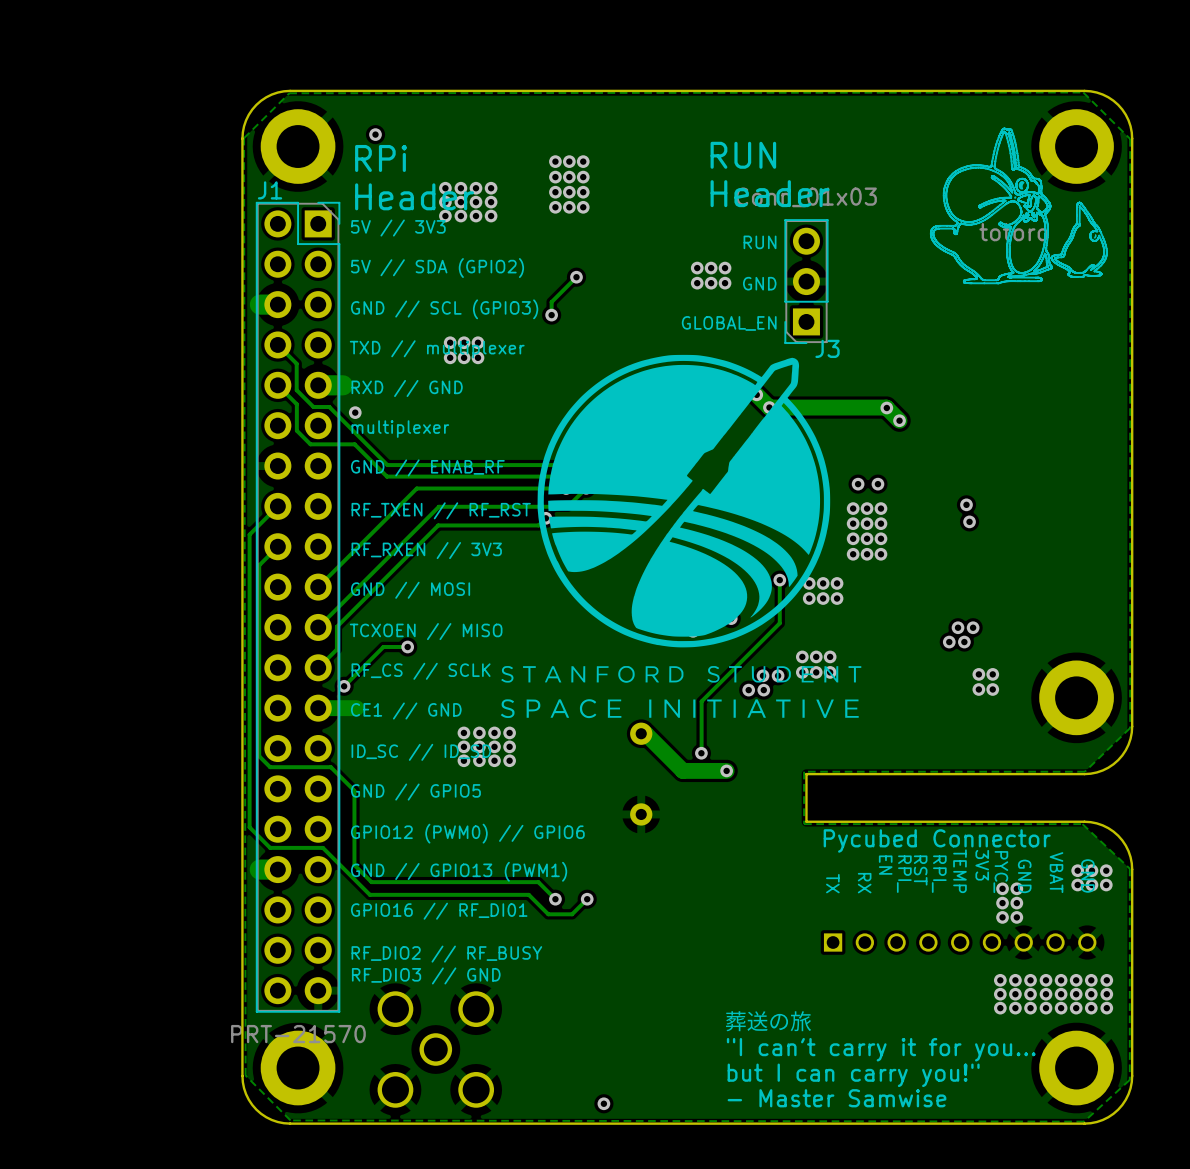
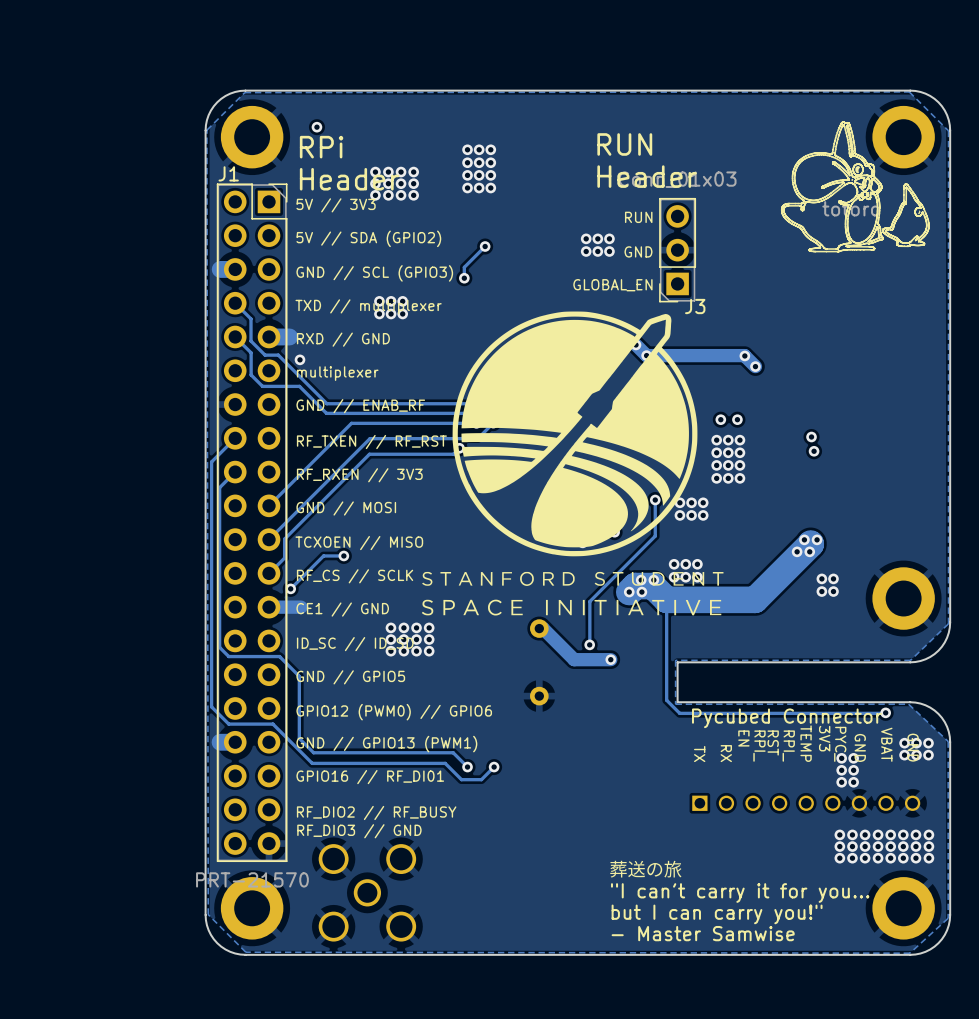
track: none -> (810, 543) (755, 599) (666, 599)
track: none -> (629, 592) (635, 586) (652, 586) (666, 599)
track: none -> (666, 599) (666, 700) (679, 713) (885, 712)
via: none -> (885, 712)
via: (603, 1103) -> none

